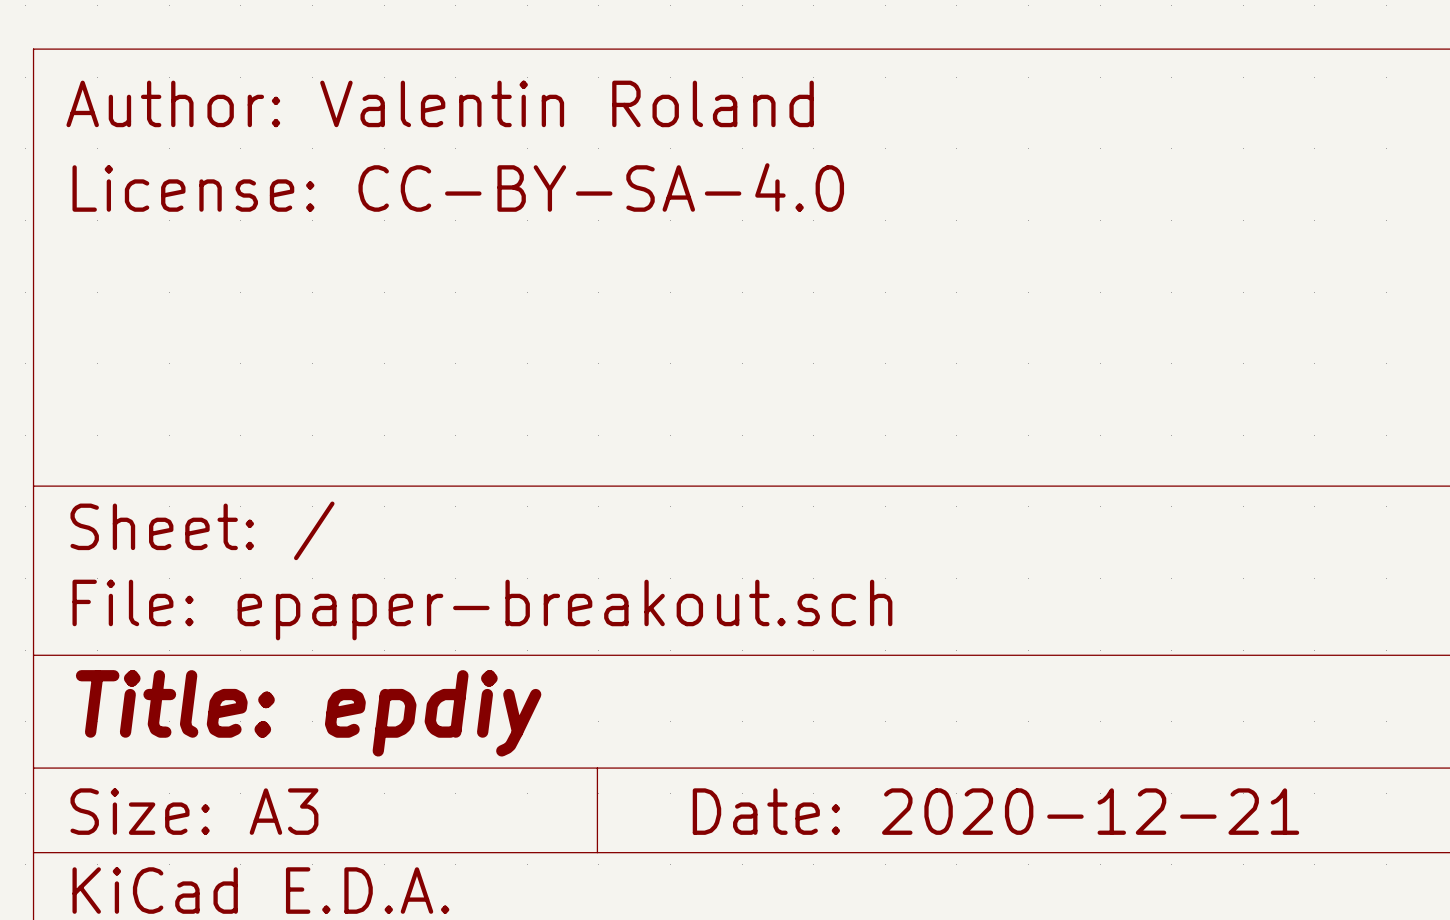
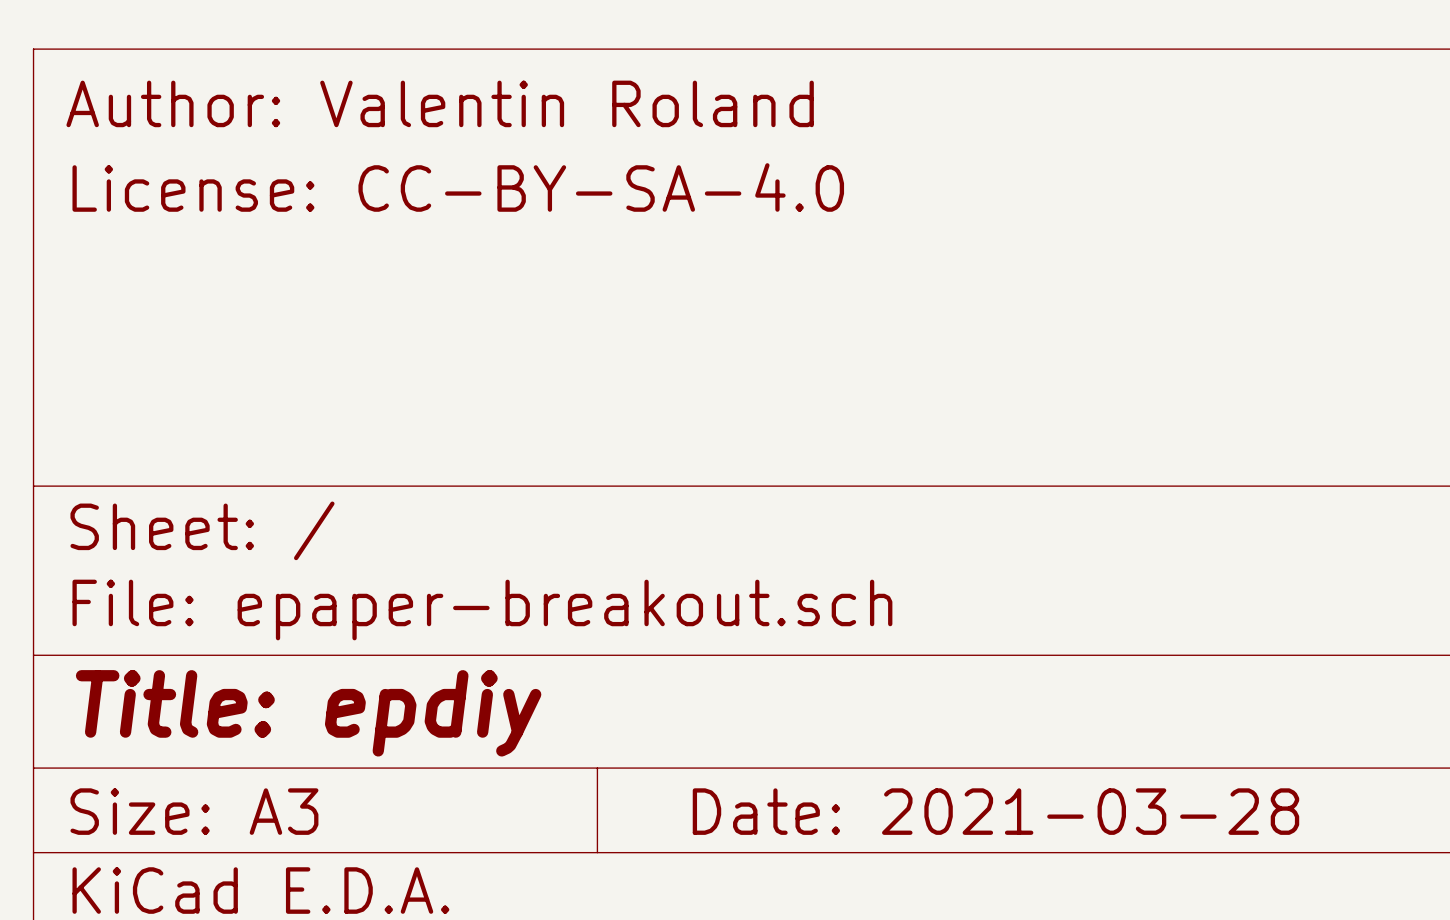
title block: Date: 2020-12-21 (995, 811) -> Date: 2021-03-28 (995, 811)

